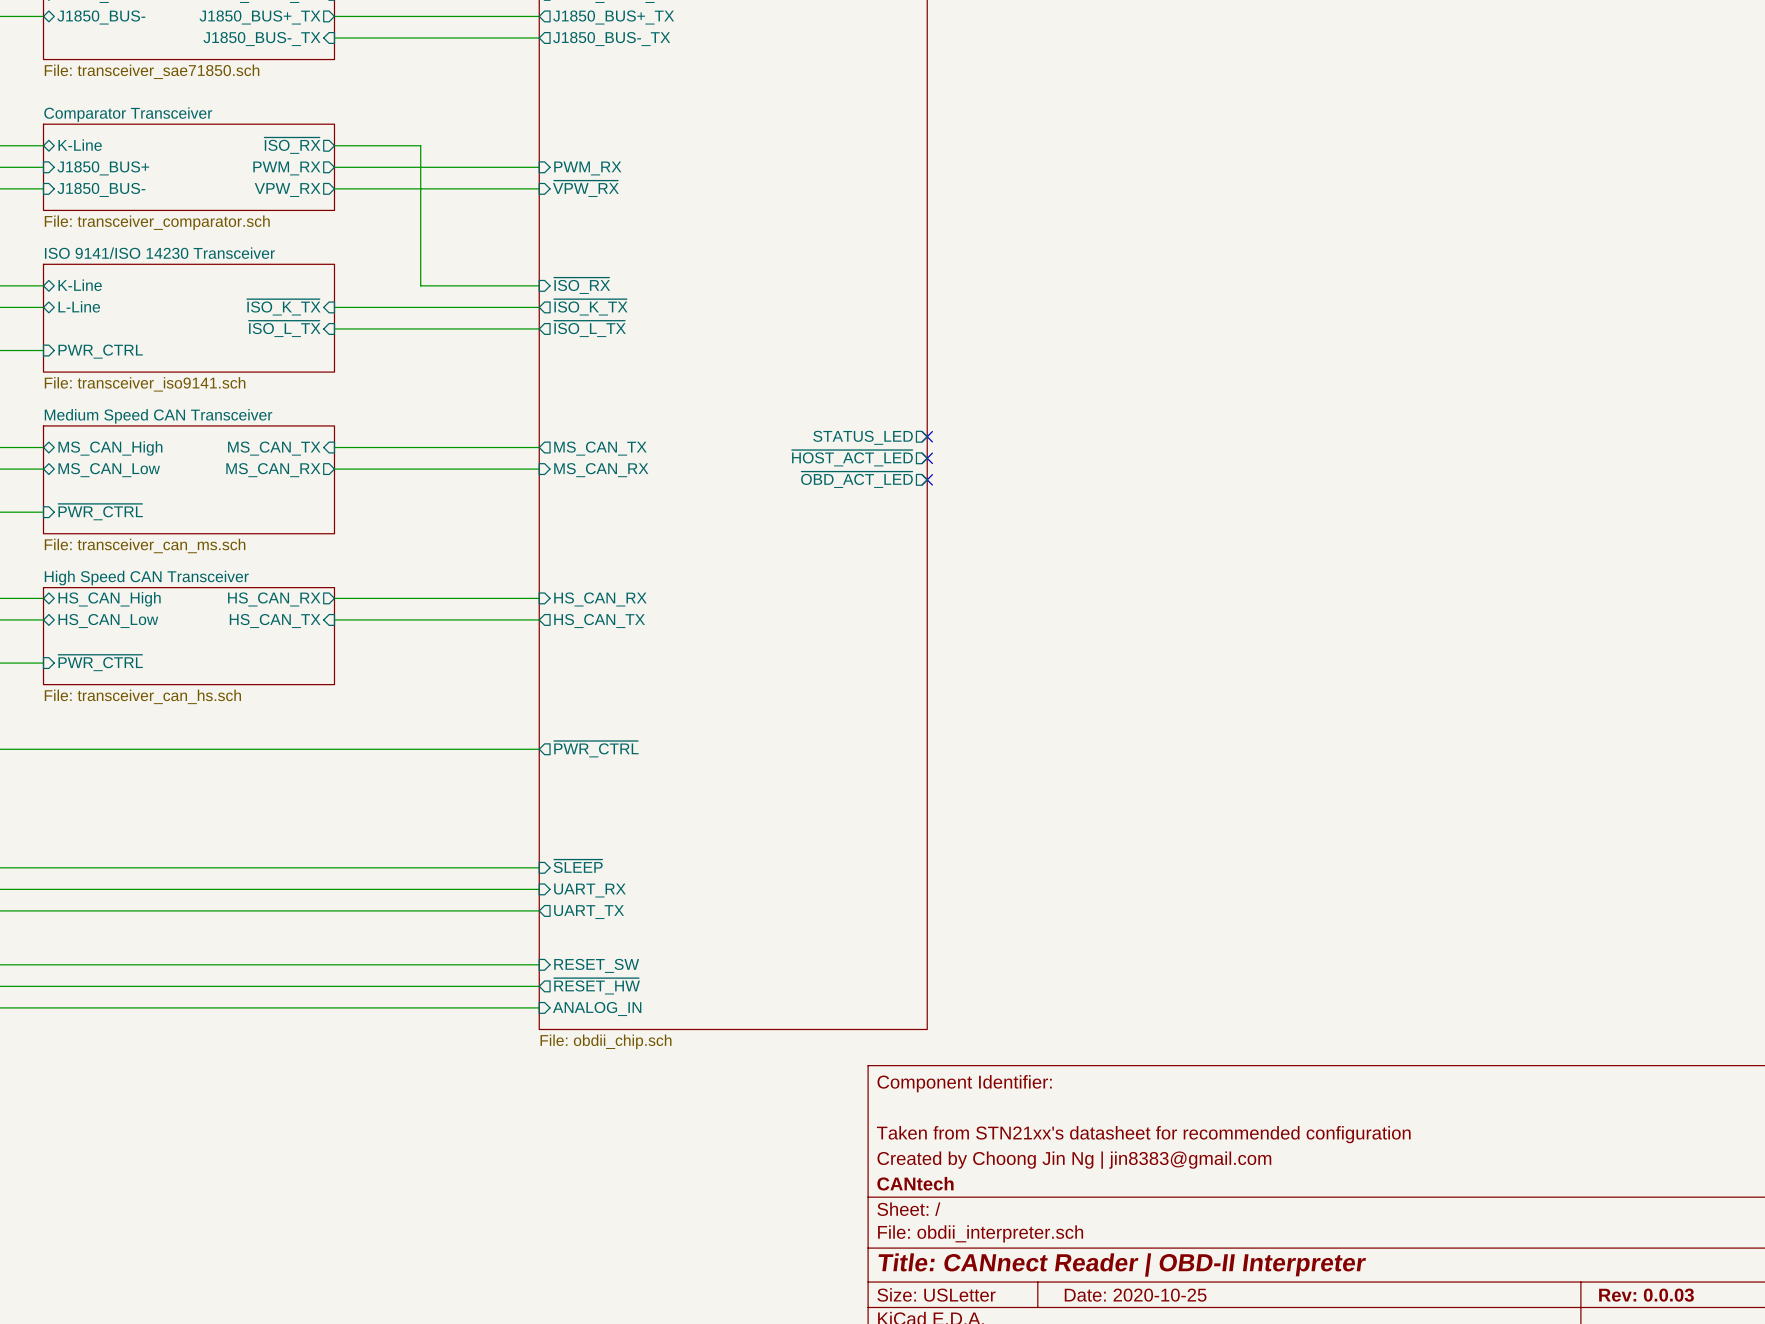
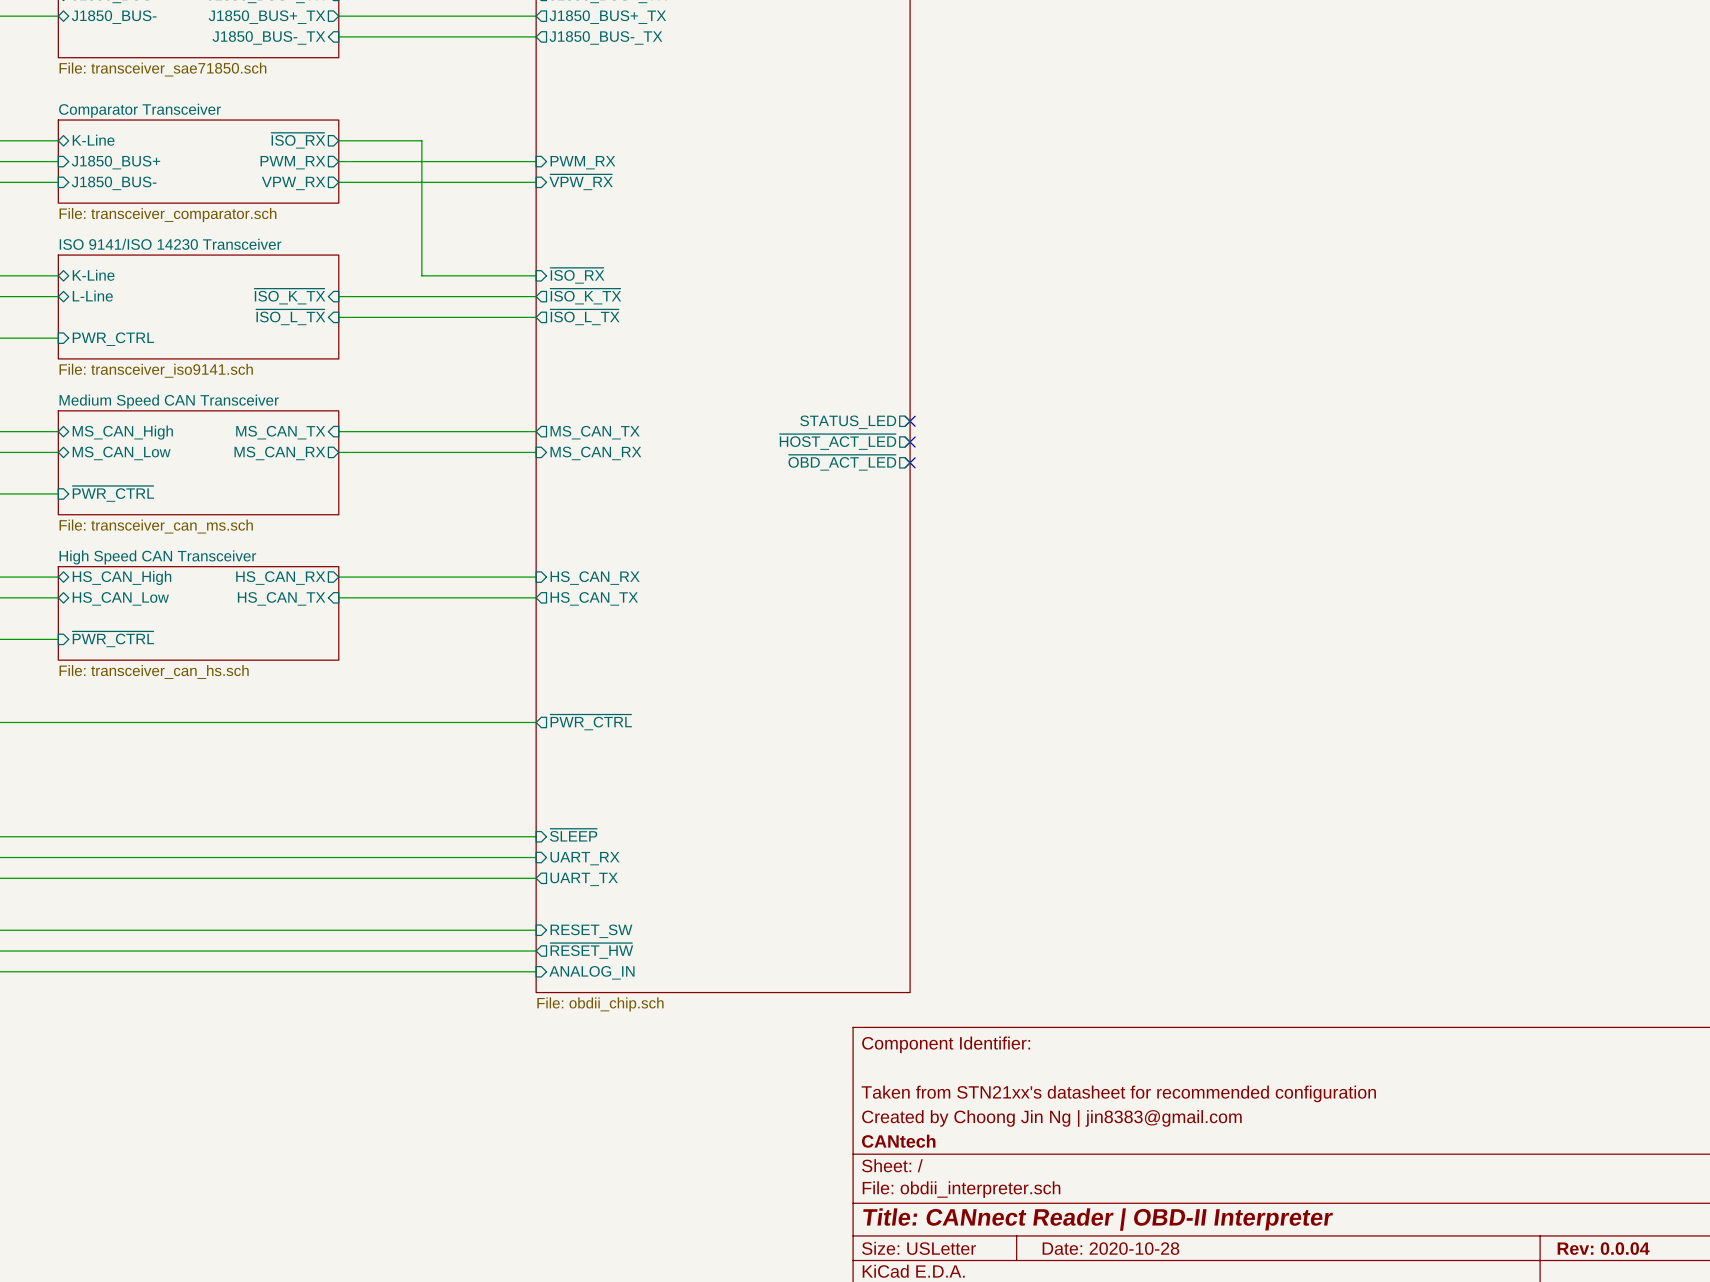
title block: Date: 2020-10-25 (1135, 1295) -> Date: 2020-10-28 (1110, 1248)
title block: Rev: 0.0.03 (1646, 1295) -> Rev: 0.0.04 (1603, 1248)

